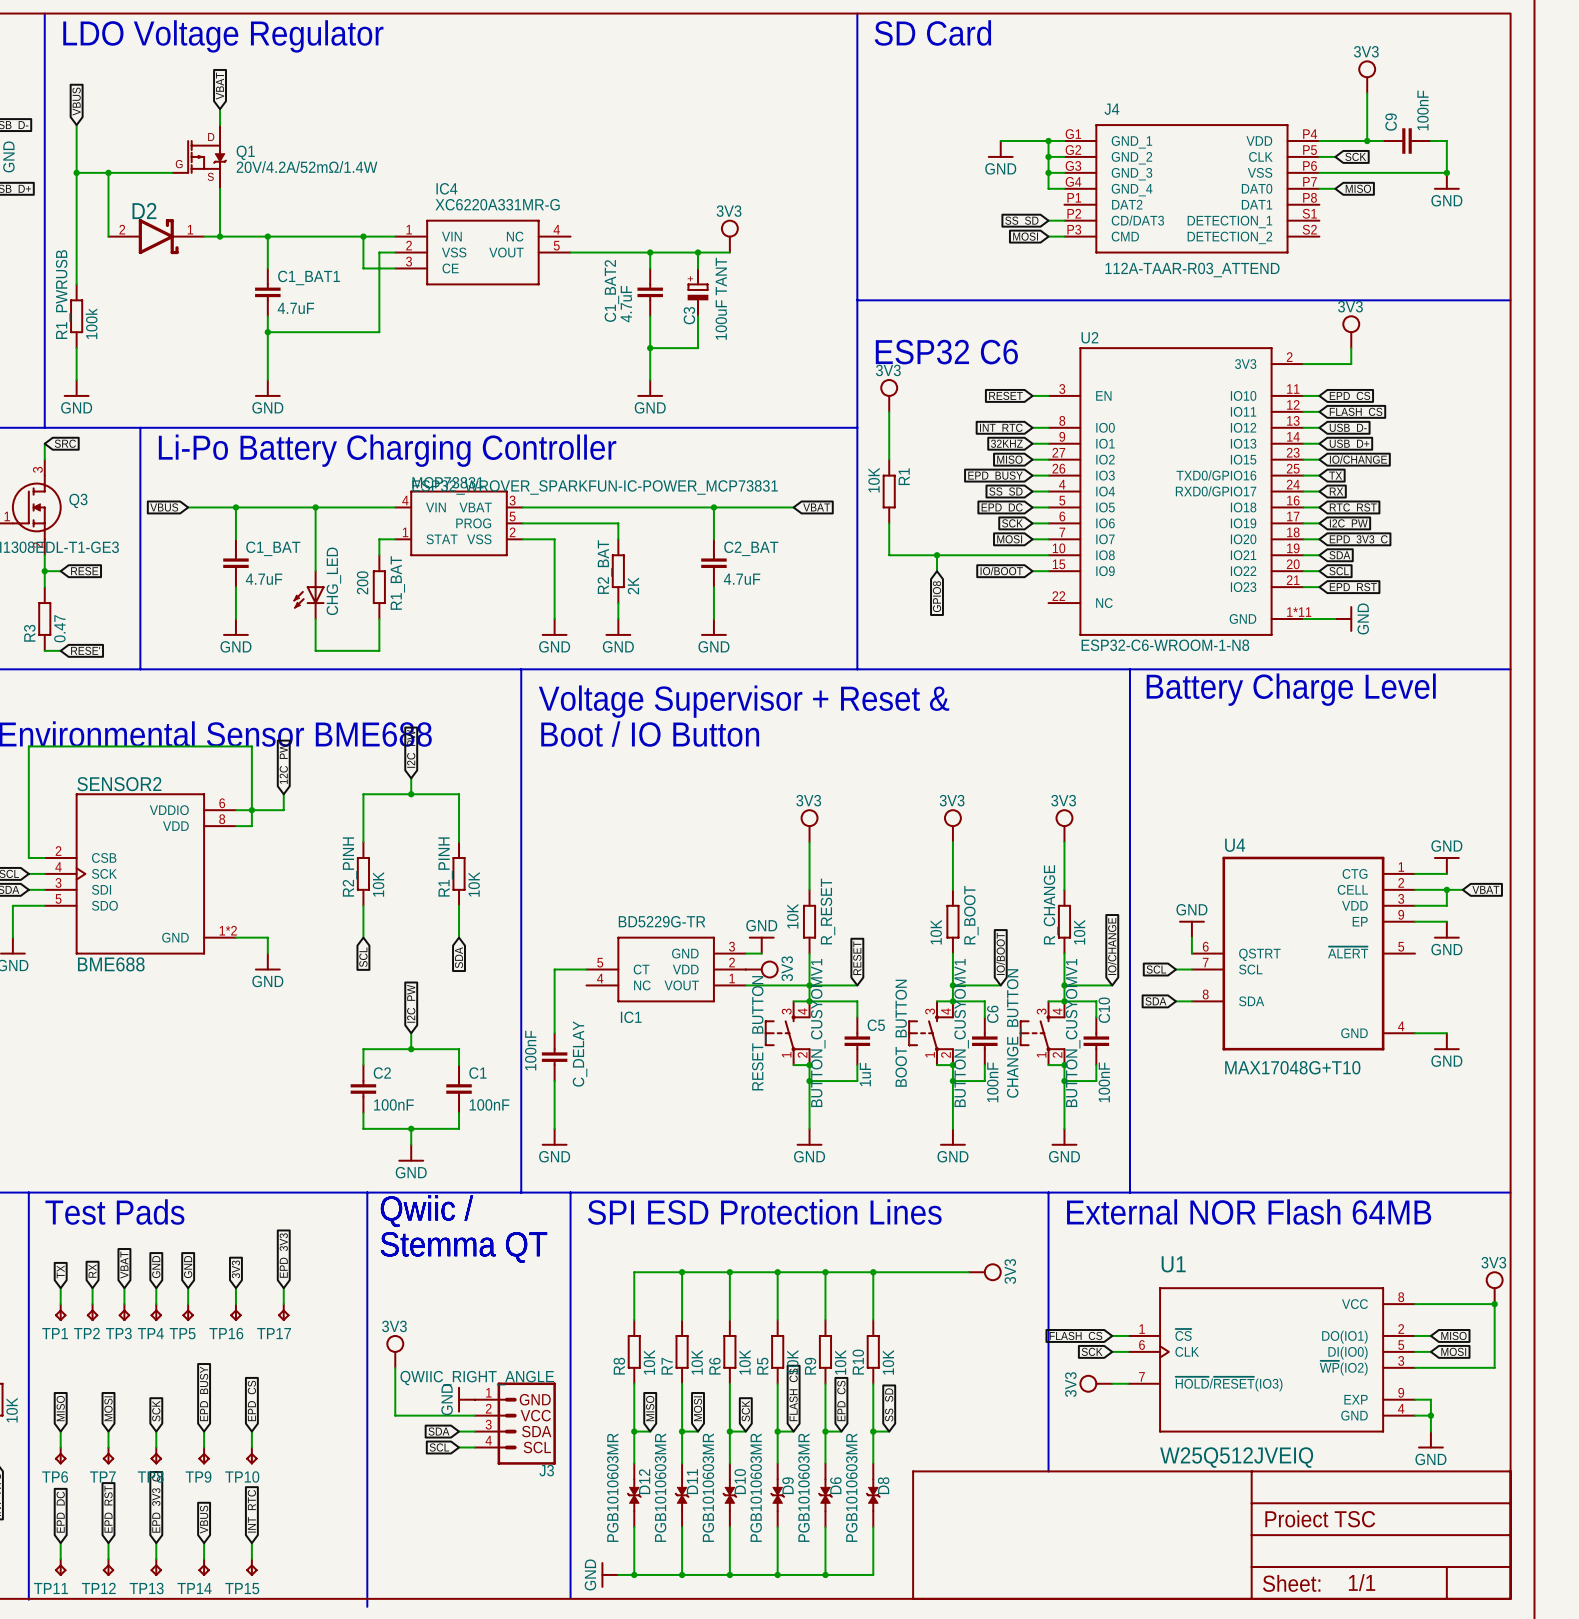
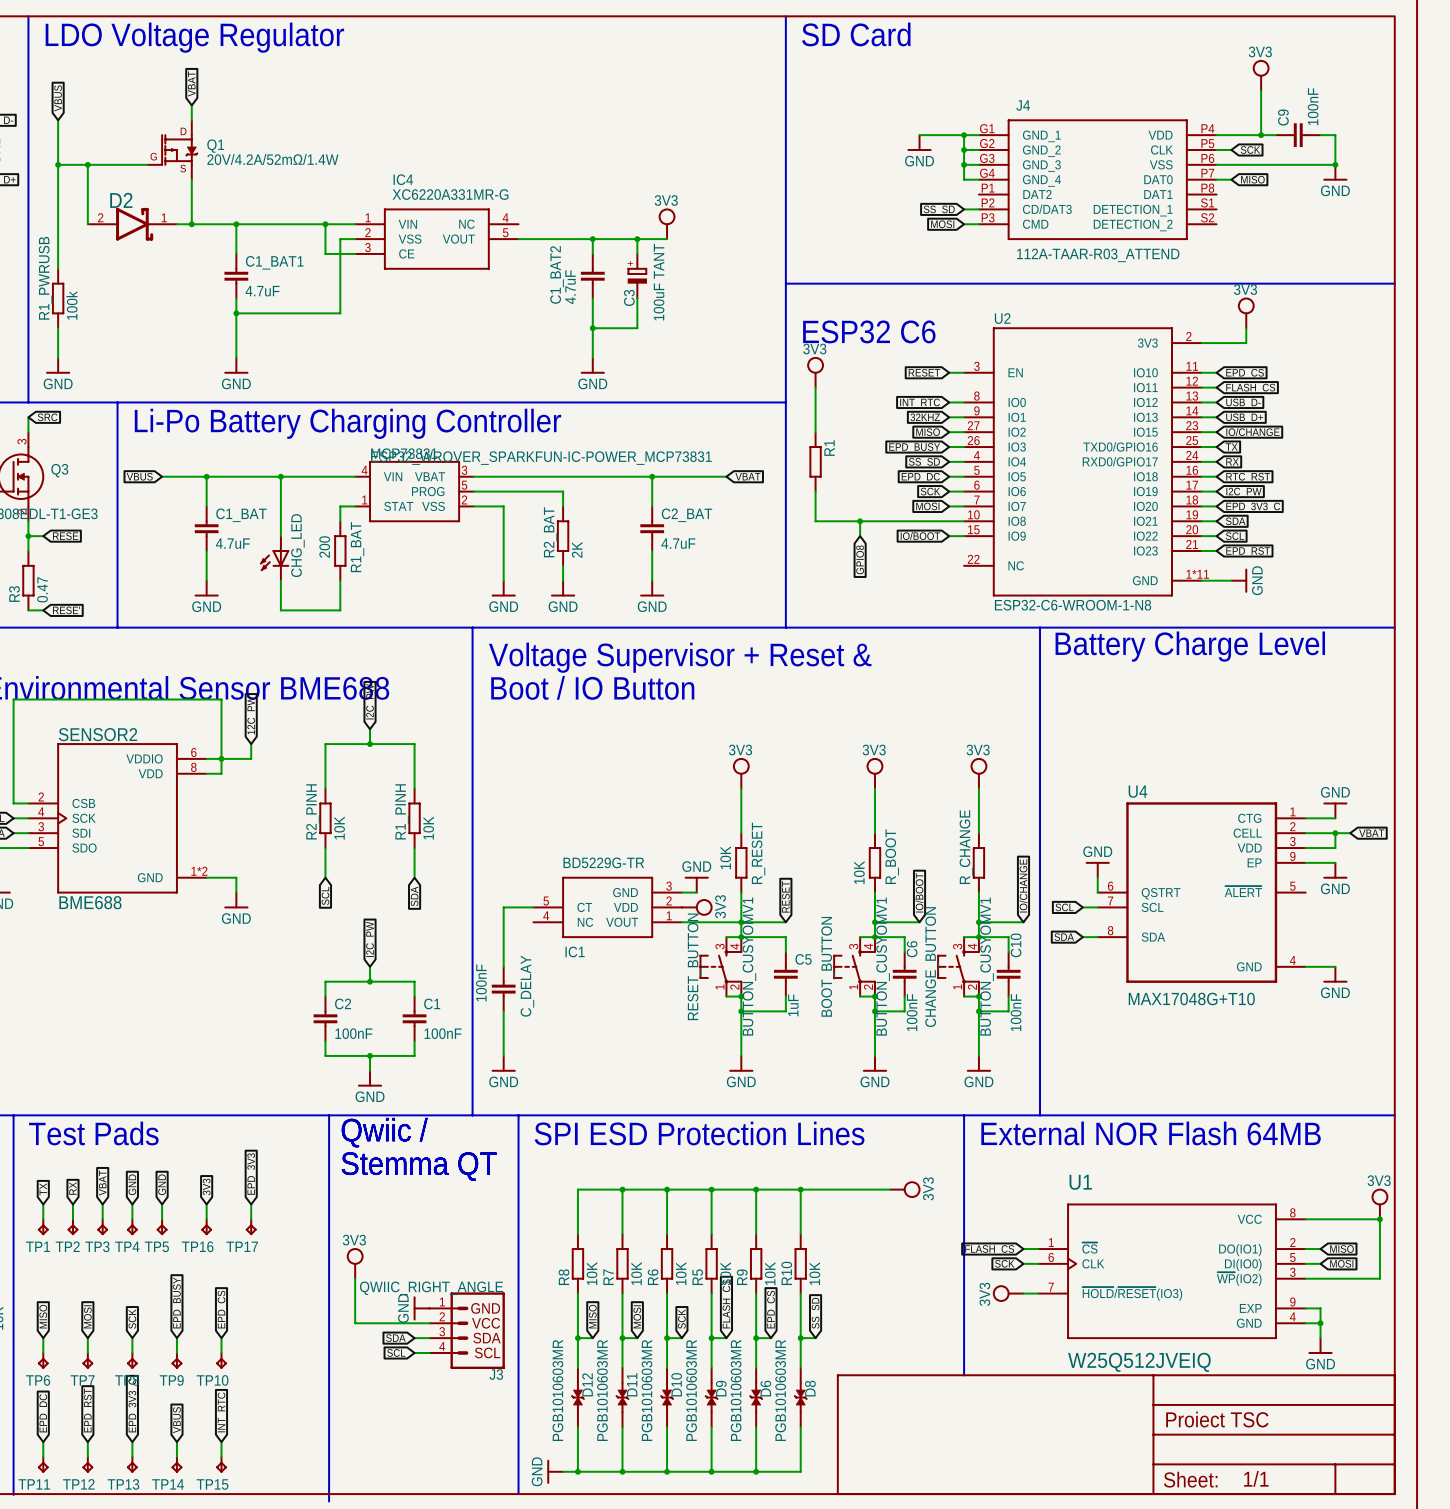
R1 value: 10K (874, 480) -> none
R_CHANGE value: 10K (1079, 932) -> none

